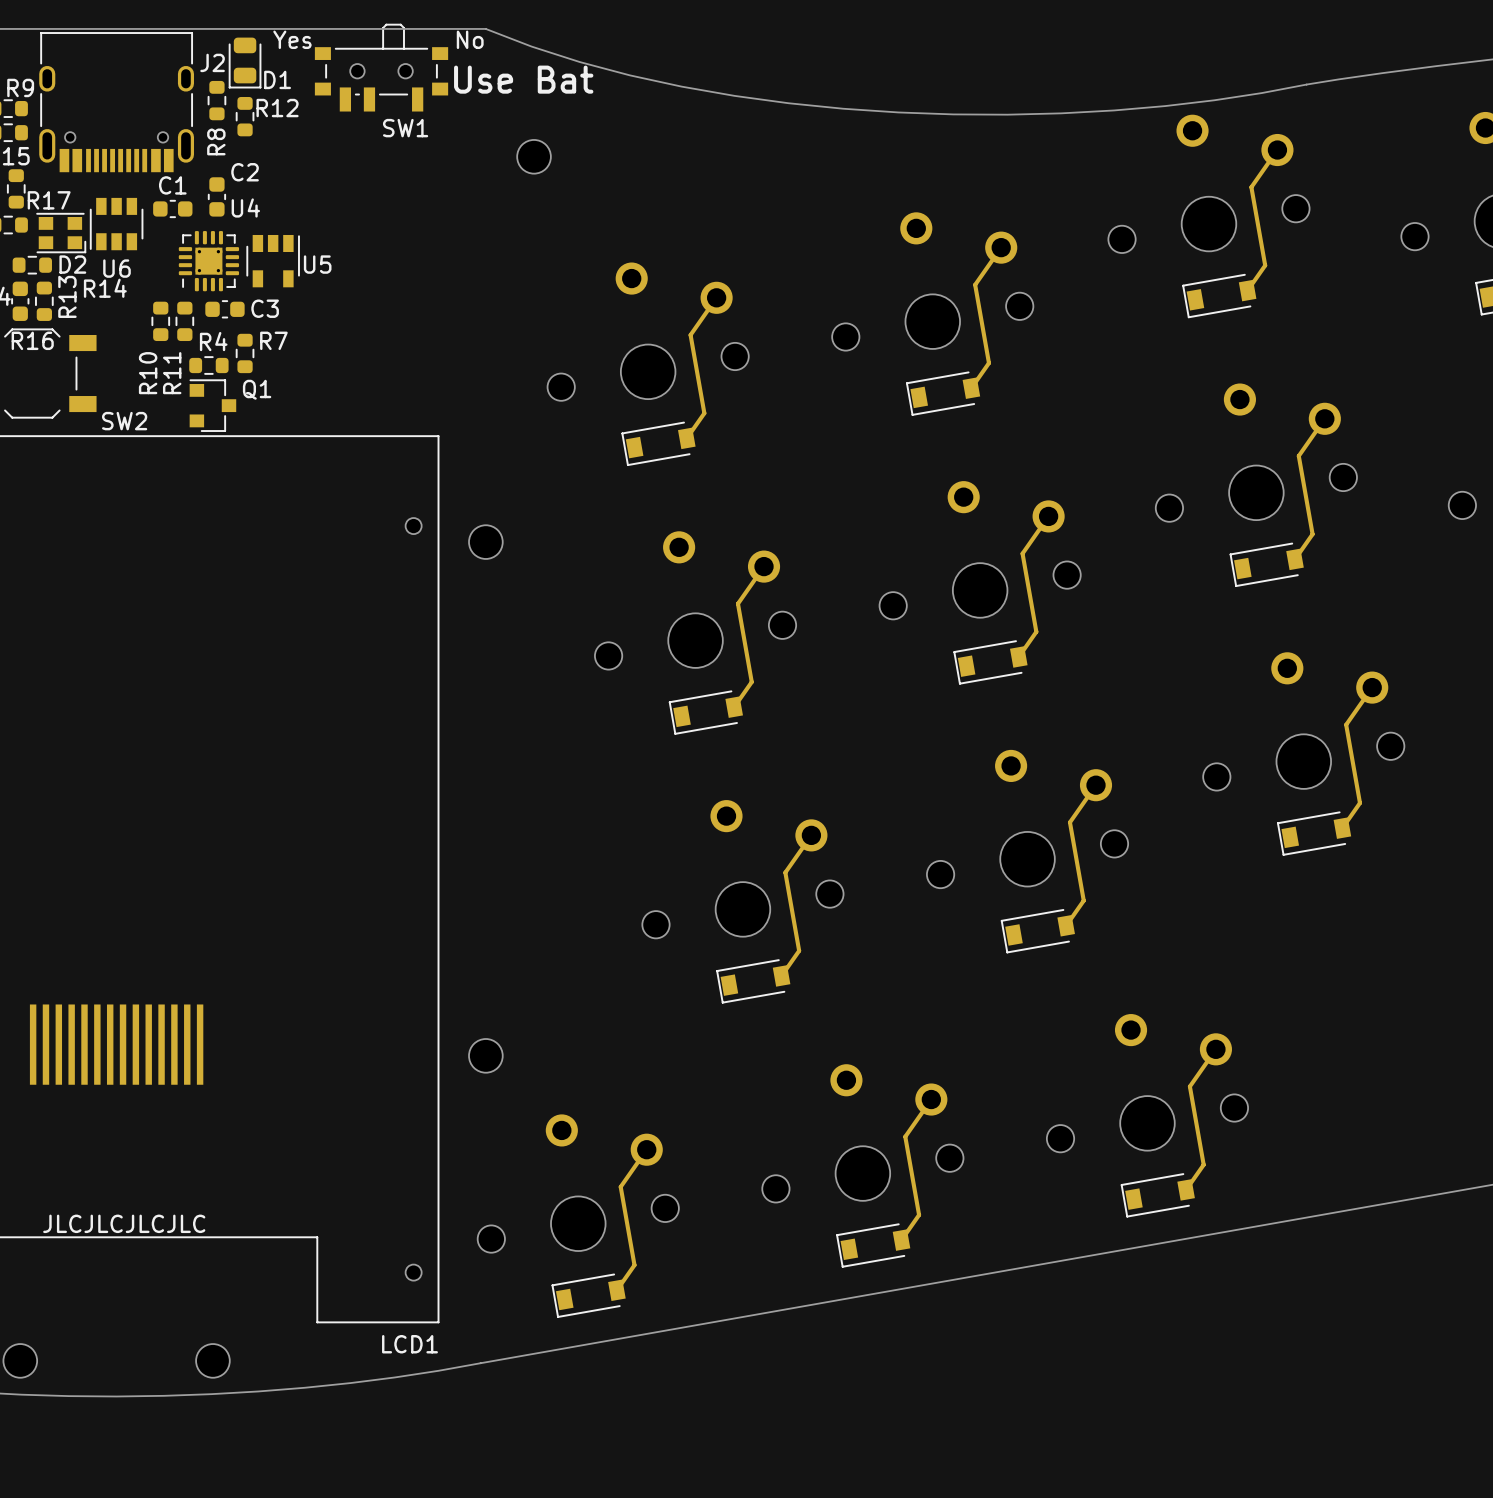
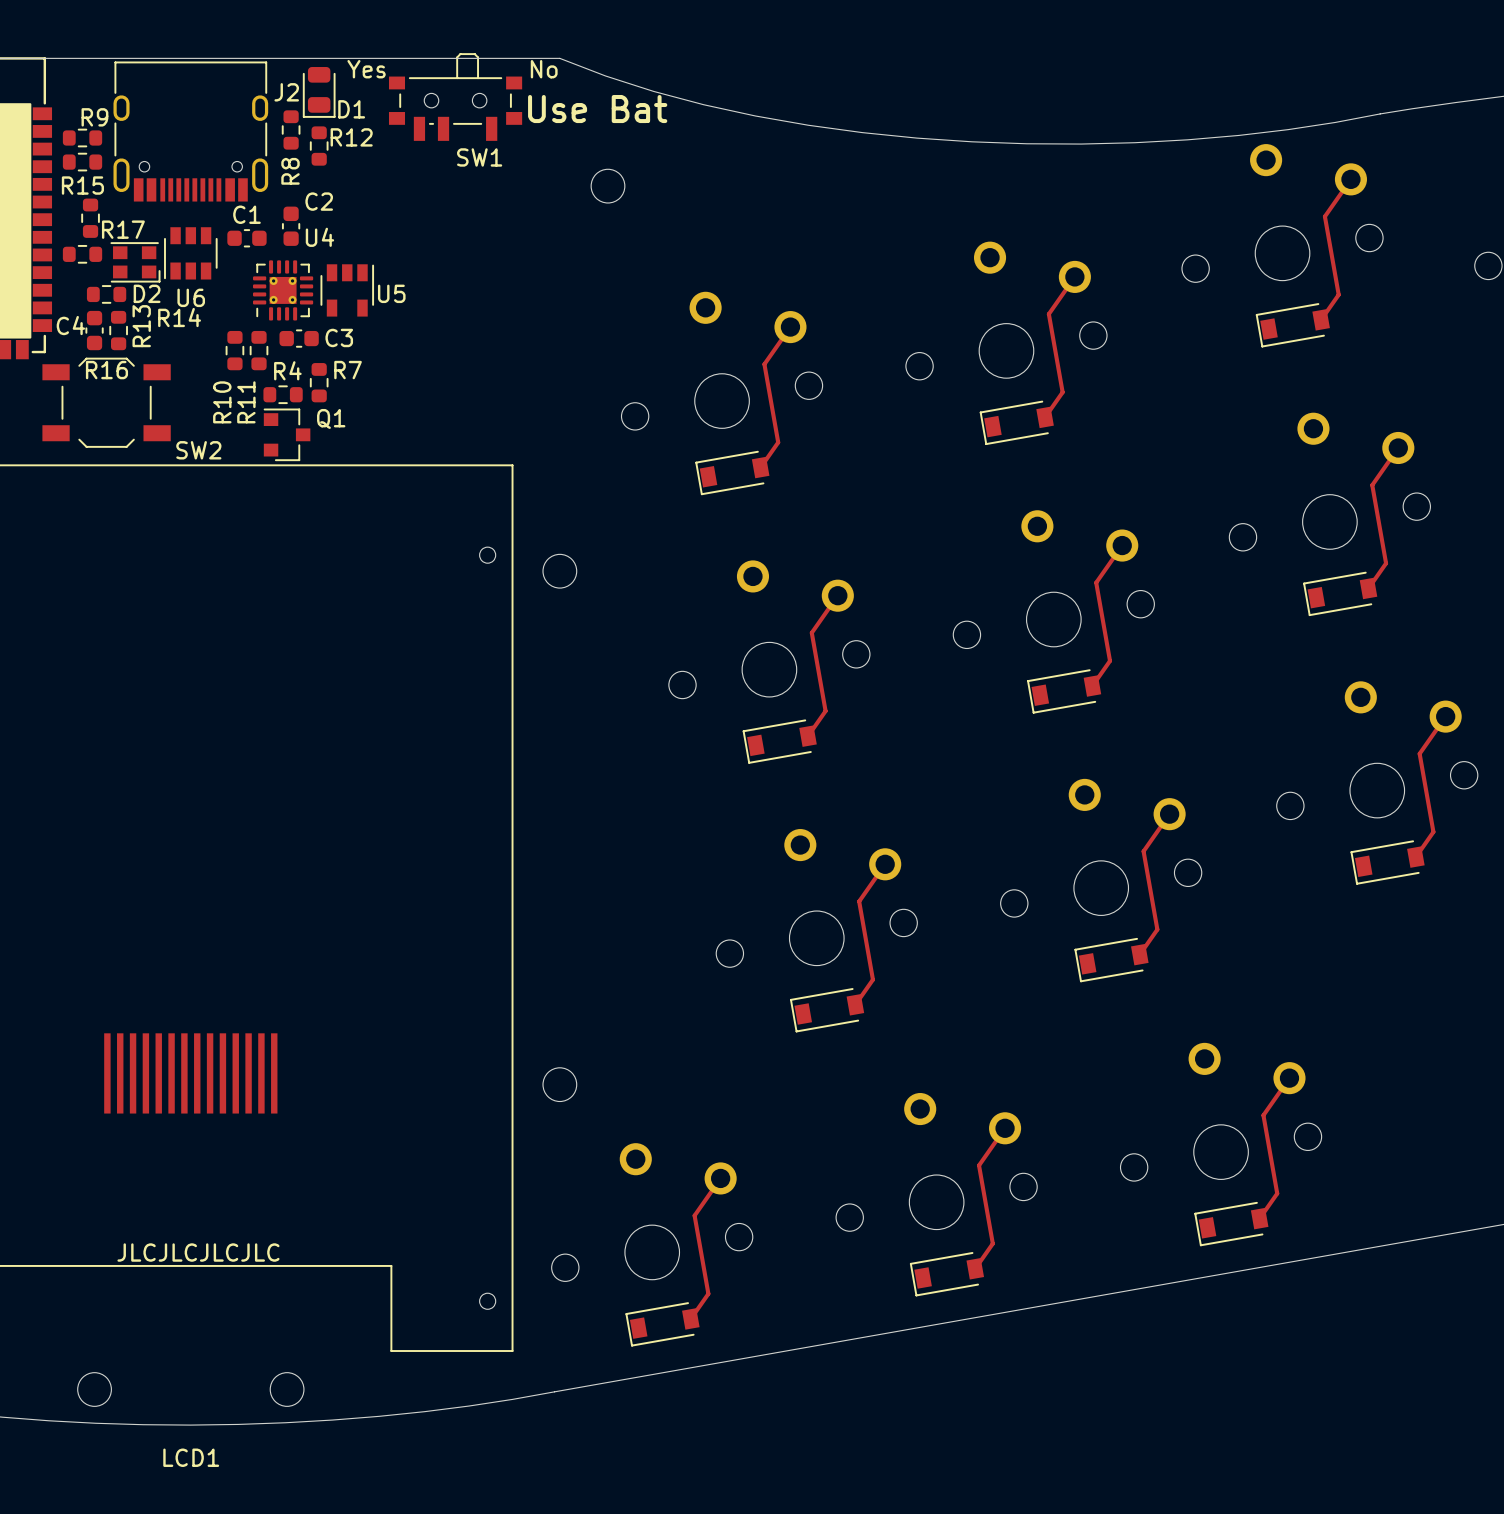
LCD1 name position: LCD1 (409, 1344) -> LCD1 (191, 1457)

